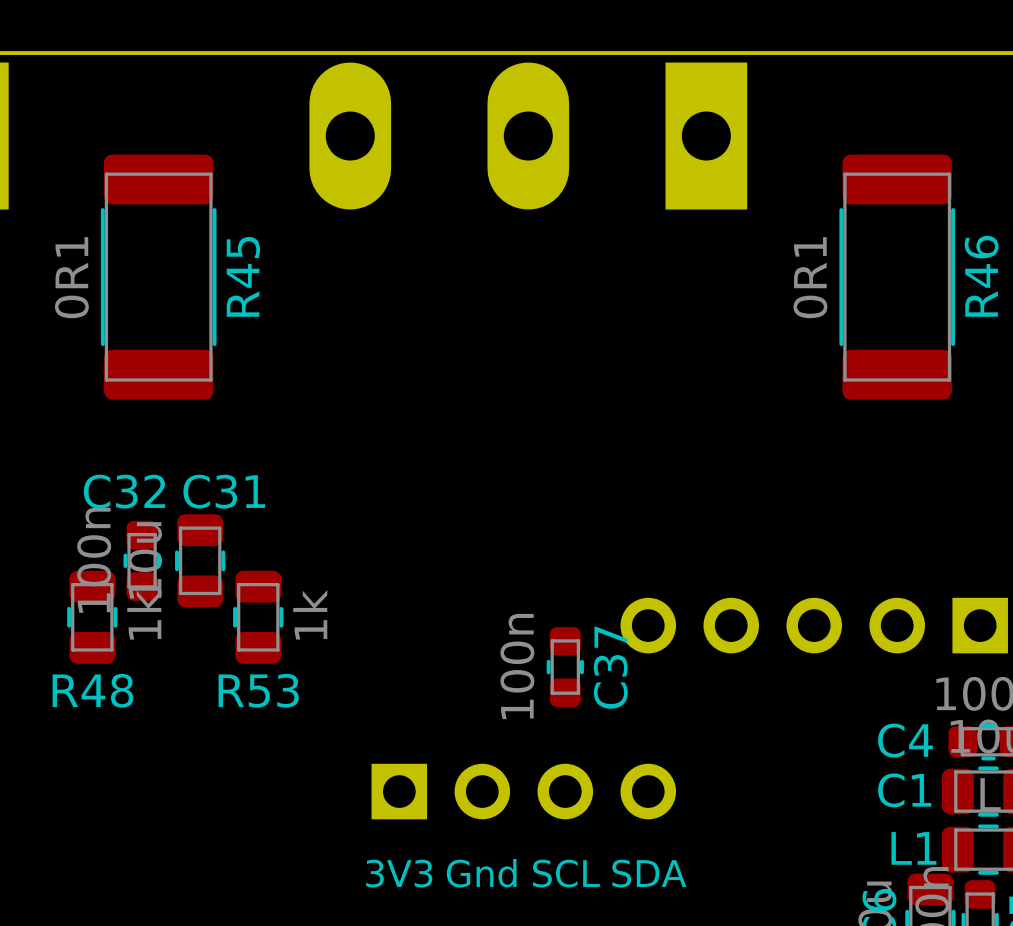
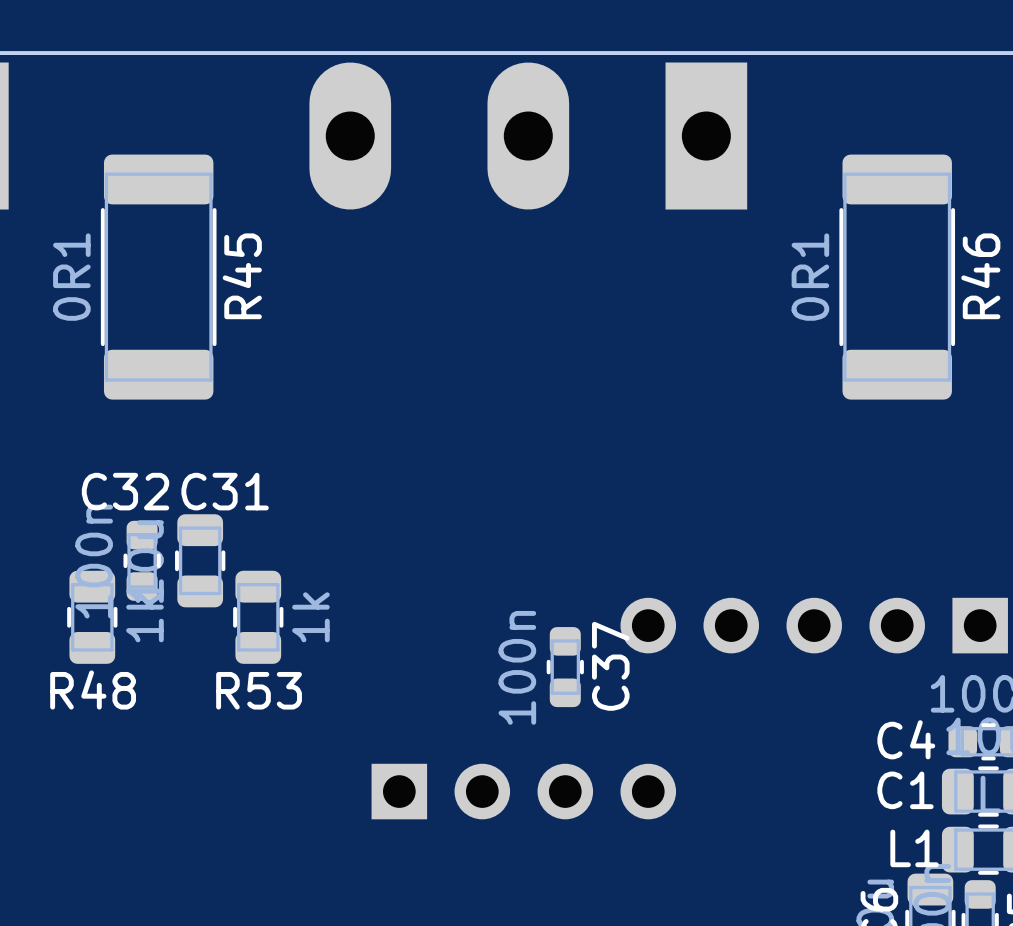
text: 3V3 (399, 873) -> none
text: Gnd (481, 873) -> none
text: SCL (566, 873) -> none
text: SDA (649, 873) -> none

